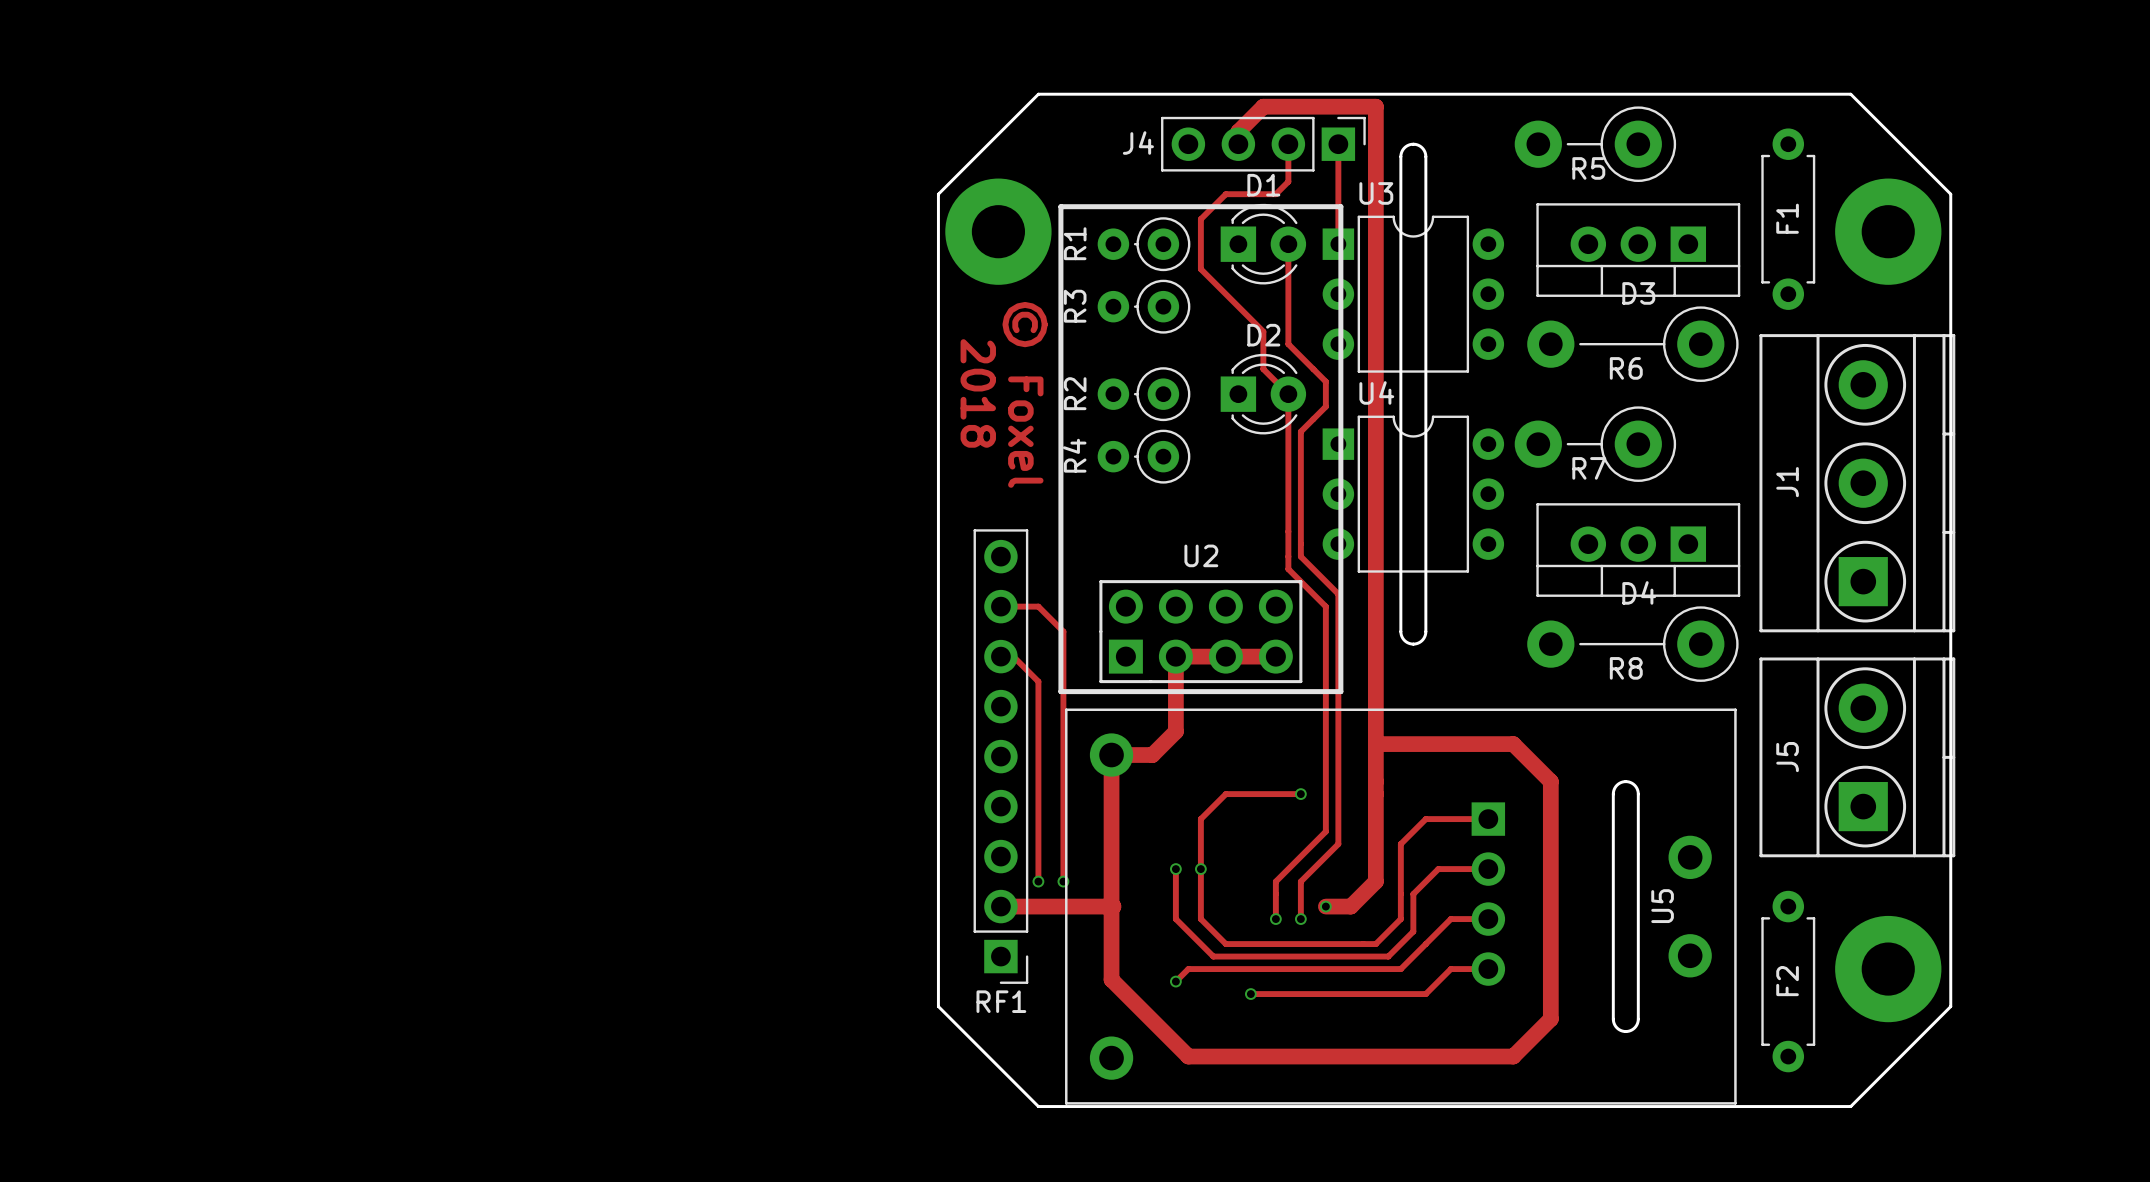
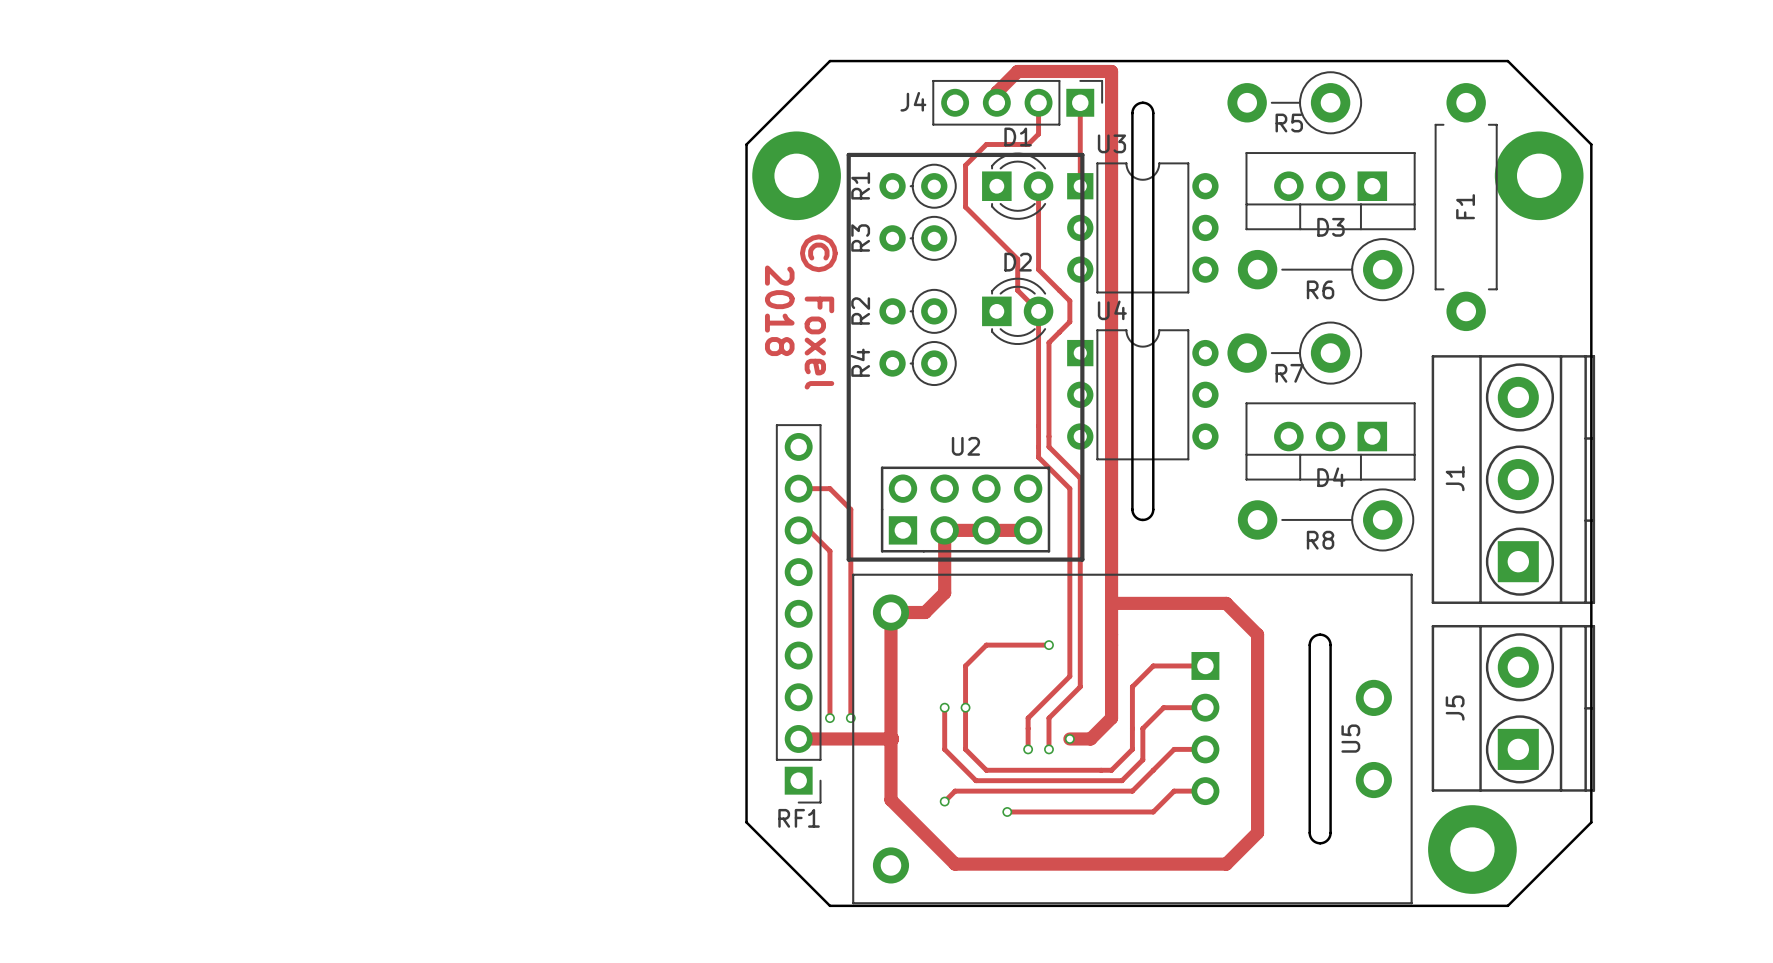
F1 footprint: [1761, 128, 1816, 310] -> [1434, 83, 1498, 332]
J1 position: (1857, 483) -> (1513, 479)
J5 position: (1857, 757) -> (1513, 708)
part position: (1888, 969) -> (1472, 849)
F2: (1788, 981) -> none

